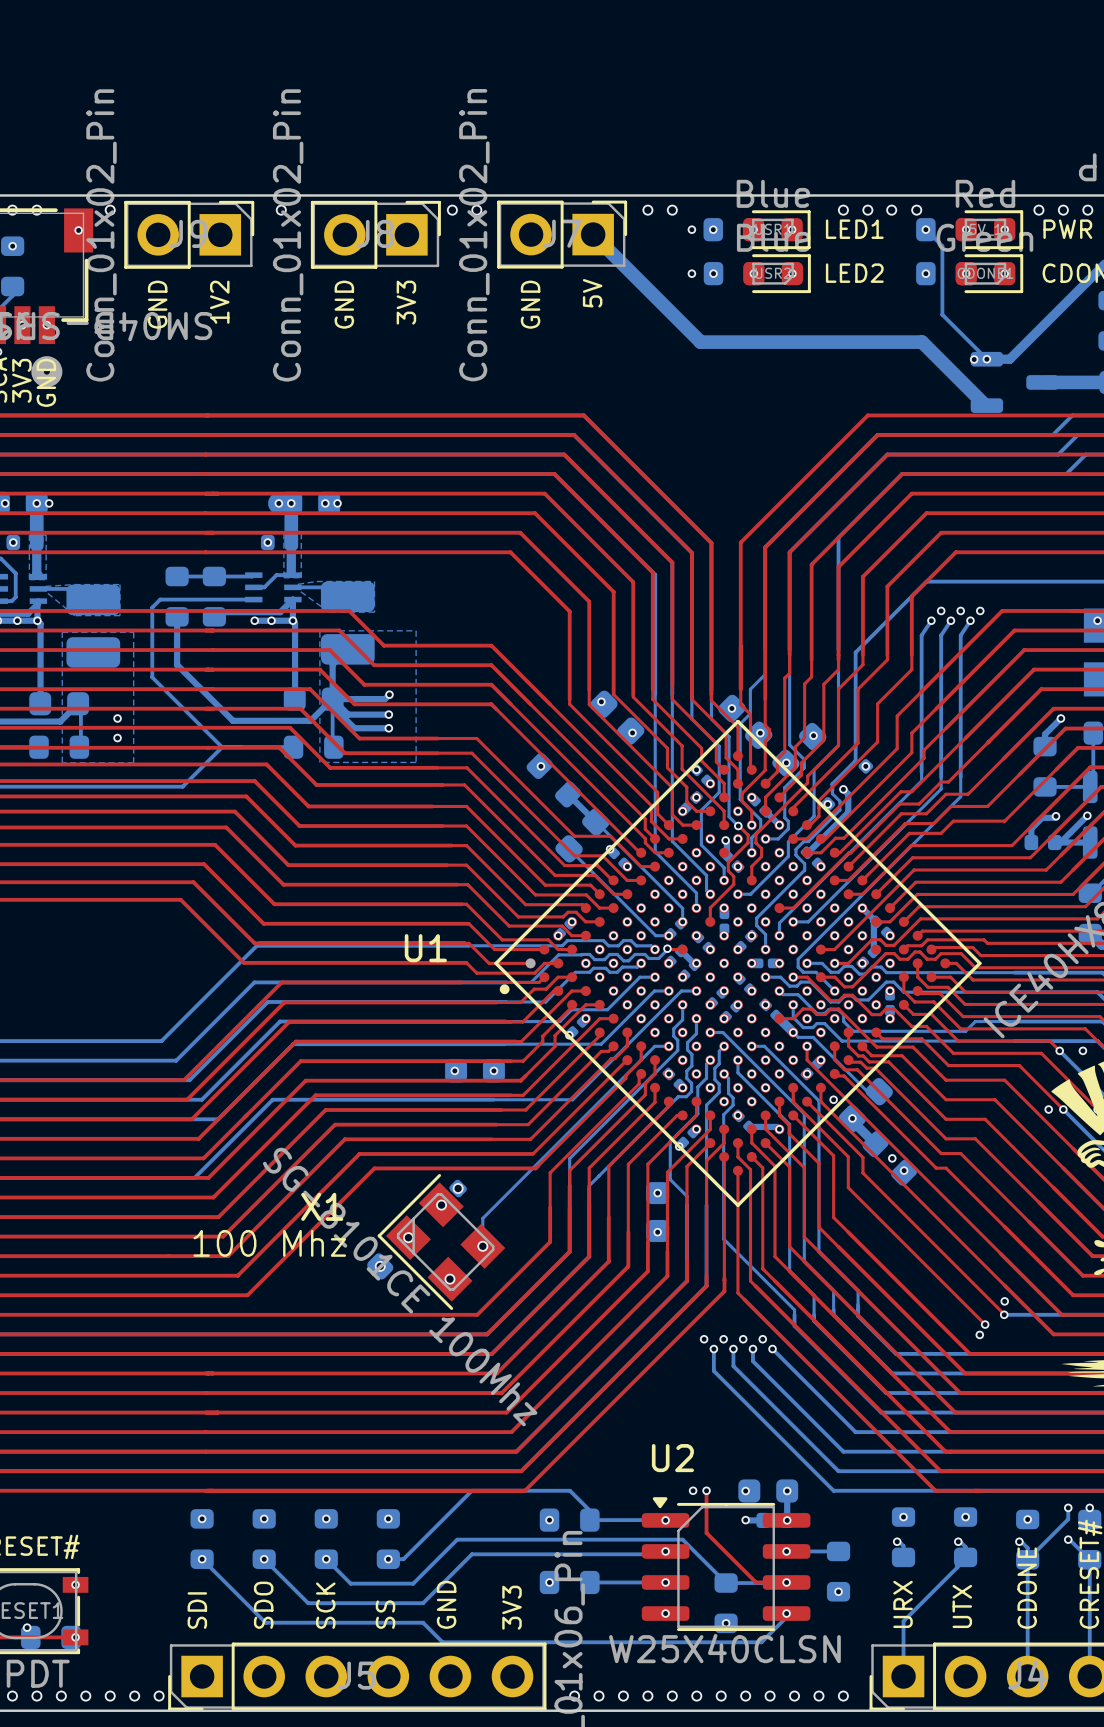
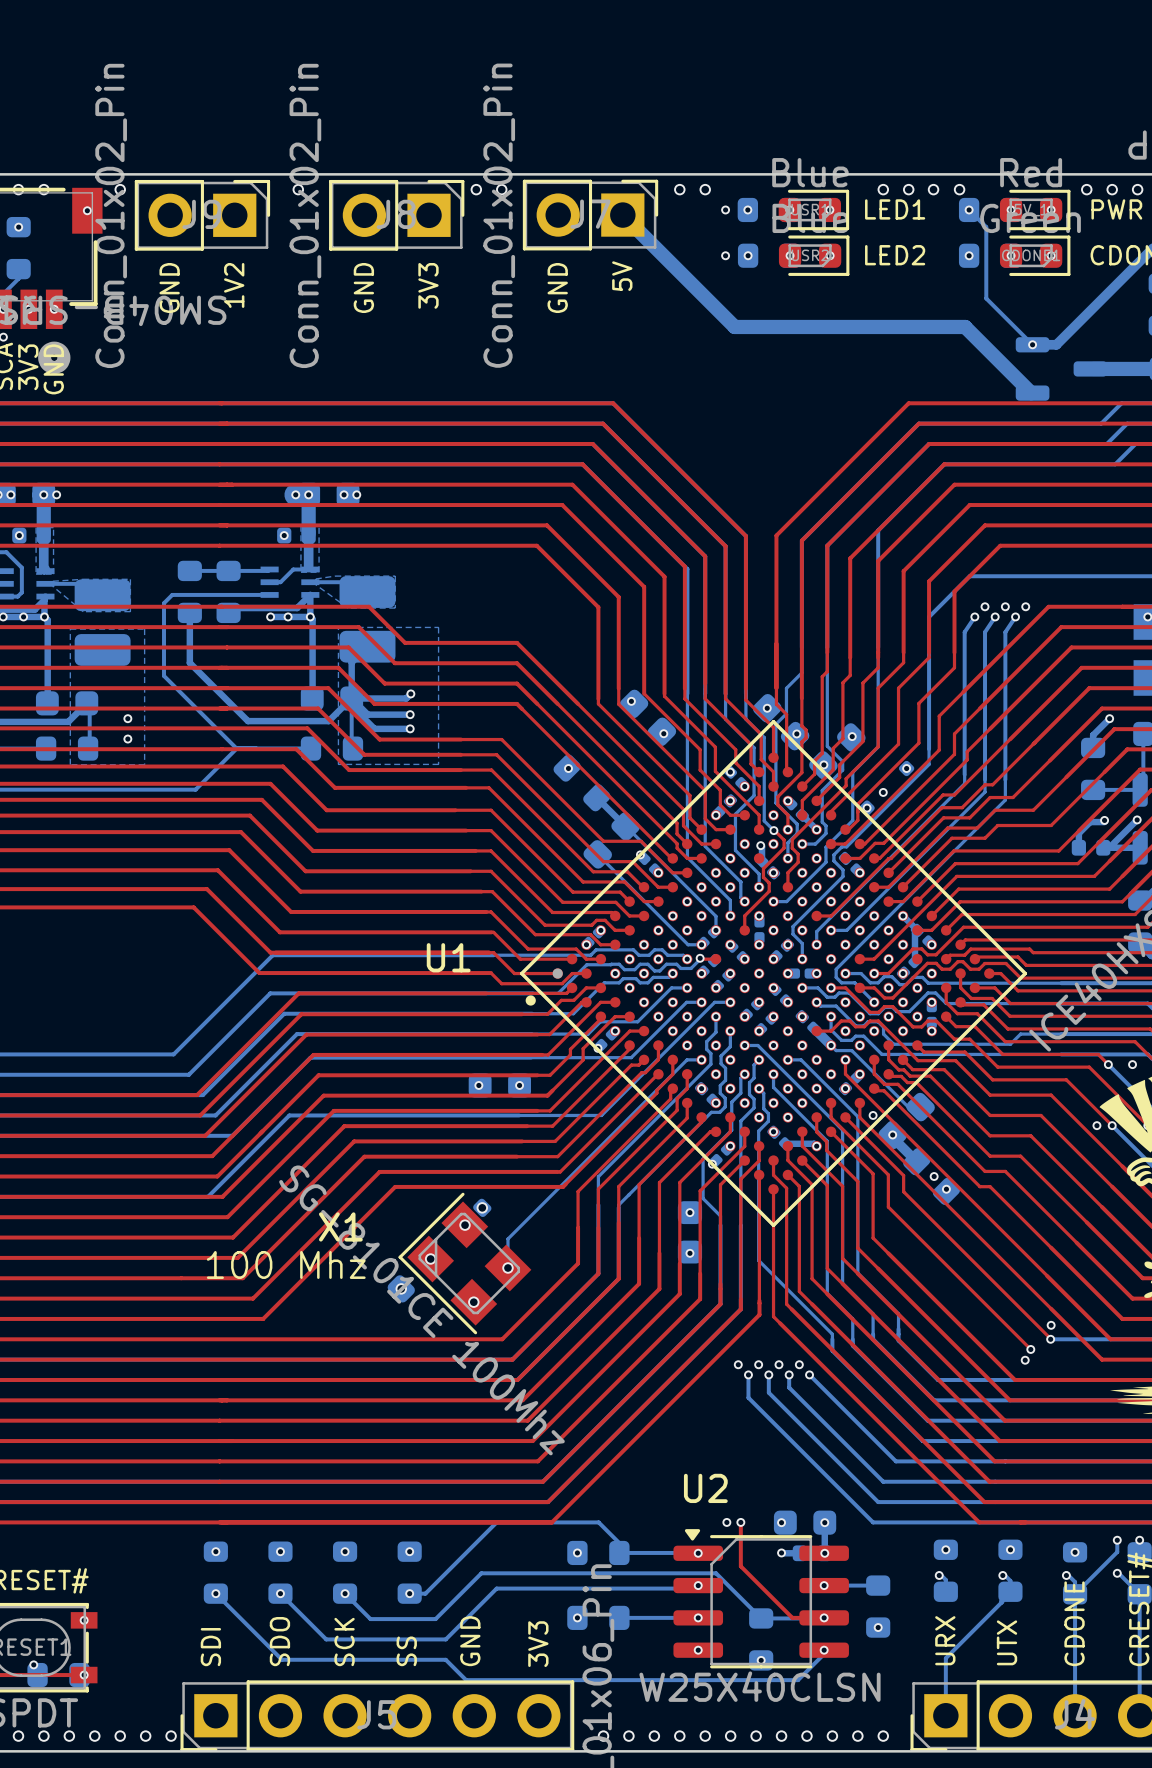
via: (974, 359) -> none
bottom track: (887, 620) (855, 652) (855, 760) (832, 784) (832, 793) (839, 801) (839, 809) -> (929, 616) (929, 764) (879, 813)
bottom track: (843, 789) (848, 794) (848, 812) (807, 852) -> none
bottom track: (681, 950) (695, 964) -> none

